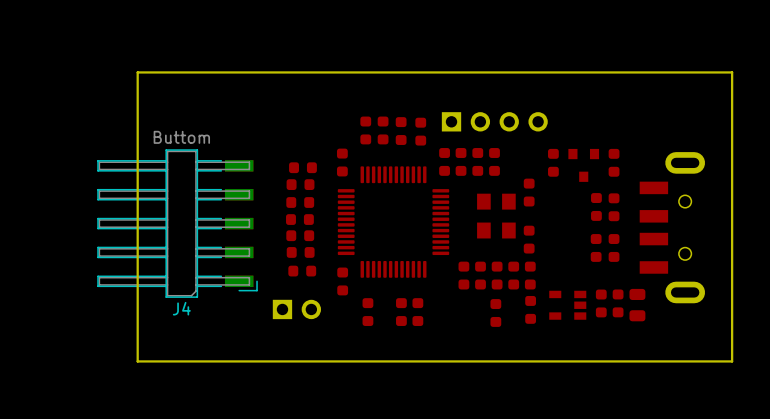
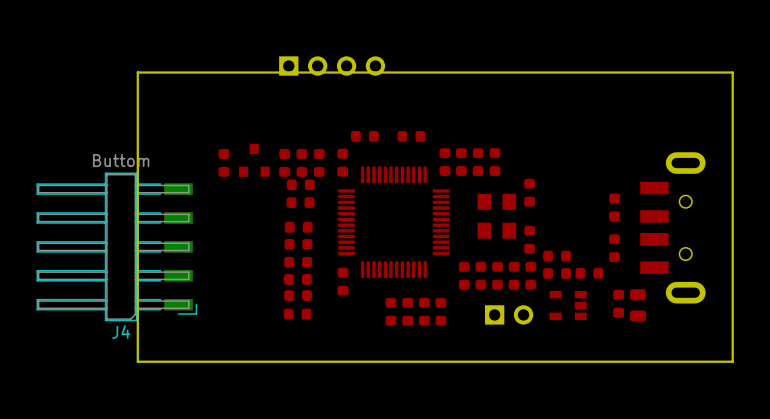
part position: (494, 121) -> (332, 66)
part rotation: 0° (365, 130) -> 90° clockwise (364, 136)
part: (383, 130) -> none
part: (401, 131) -> none
part: (420, 131) -> none
part: none -> (411, 136)
part: none -> (254, 160)
part: none -> (223, 162)
part: none -> (284, 162)
part: none -> (319, 162)
part: (553, 162) -> none
part: (614, 162) -> none
part: (583, 165) -> none
part rotation: 0° (302, 167) -> 90° clockwise (301, 162)
part: (596, 206) -> none
part: (299, 219) -> none
J4 position: (177, 223) -> (116, 246)
part: none -> (298, 227)
part: (300, 235) -> none
part: none -> (298, 244)
part: (596, 247) -> none
part: (300, 252) -> none
part: none -> (557, 256)
part: none -> (298, 262)
part: (302, 271) -> none
part: none -> (557, 273)
part: none -> (589, 273)
part: none -> (297, 279)
part: none -> (298, 295)
part footprint: [272, 299, 322, 320] -> [283, 308, 312, 320]
part: (601, 303) -> none
part: (530, 309) -> none
part: none -> (390, 311)
part: none -> (407, 311)
part: none -> (424, 311)
part: none -> (440, 311)
part: (367, 312) -> none
part: (401, 312) -> none
part: (417, 312) -> none
part: (495, 312) -> none
part: none -> (509, 314)

